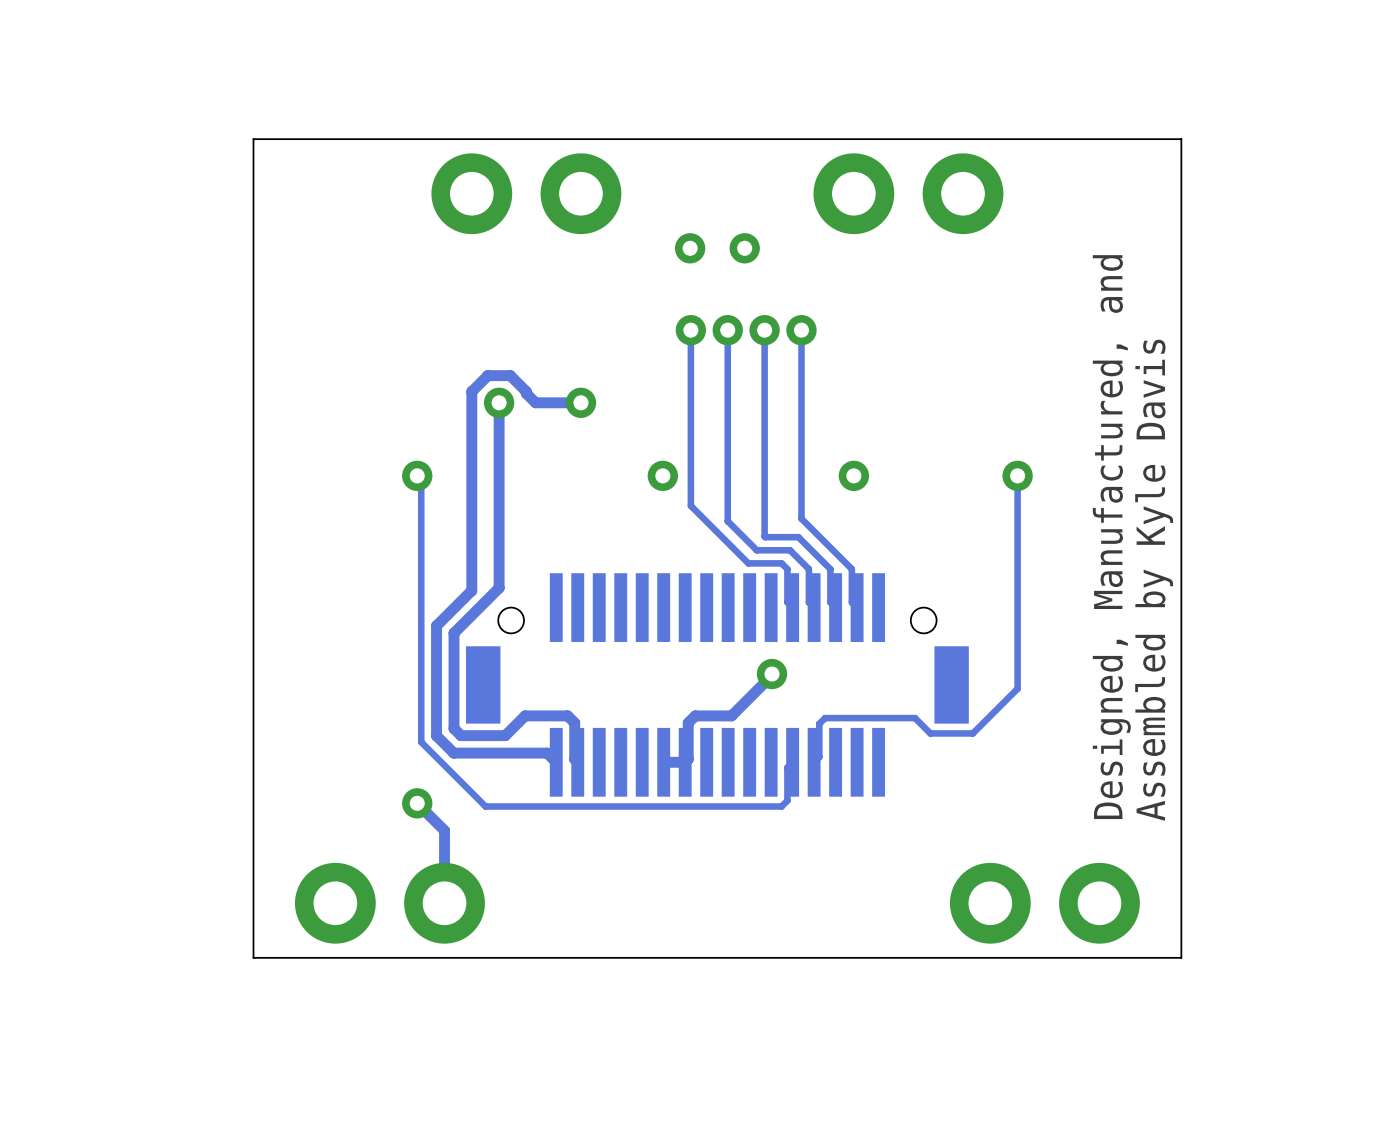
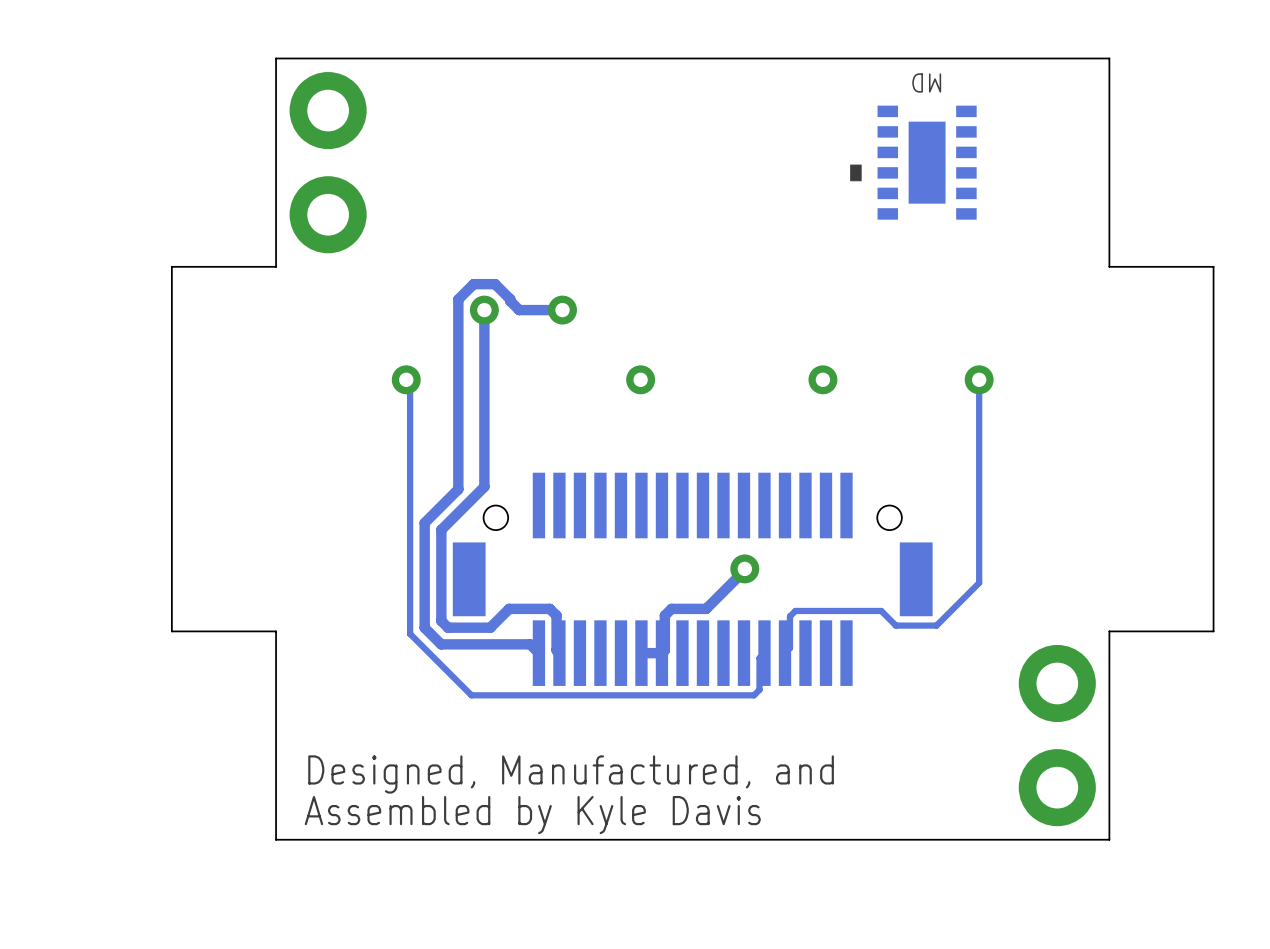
board edge: (280, 139) (253, 139) (253, 957) (280, 957) -> (276, 58) (276, 266) (171, 266) (171, 631) (276, 631) (276, 839)
board edge: (1154, 139) (1181, 139) (1181, 957) (1154, 957) -> (1109, 58) (1109, 266) (1213, 266) (1213, 631) (1109, 631) (1109, 839)
part: none -> (328, 110)
part: (471, 193) -> none
part: (580, 193) -> none
part: (853, 193) -> none
part: (963, 193) -> none
via: (690, 248) -> none
via: (744, 248) -> none
MD: none -> (913, 162)
part: none -> (328, 214)
track: (690, 330) (690, 505) (748, 563) (781, 563) (787, 569) (787, 602) (792, 607) -> none
via: (690, 330) -> none
track: (727, 330) (727, 521) (756, 550) (790, 550) (808, 569) (808, 602) (814, 607) -> none
via: (727, 330) -> none
track: (764, 330) (764, 536) -> none
via: (764, 330) -> none
track: (801, 330) (801, 518) (851, 569) (851, 602) (857, 607) -> none
via: (801, 330) -> none
track: (765, 537) (798, 537) (830, 569) (830, 602) (835, 607) -> none
text rotation: 0° (1111, 537) -> 90° clockwise (571, 774)
text rotation: 0° (1154, 580) -> 90° clockwise (532, 815)
text position: Assembled by Kyle Davis (1154, 580) -> Assembled by Kyle Davis (532, 815)
track: (417, 803) (444, 830) (444, 903) -> none
via: (417, 803) -> none
part: (335, 903) -> none
part: (444, 903) -> none
part position: (990, 903) -> (1057, 683)

